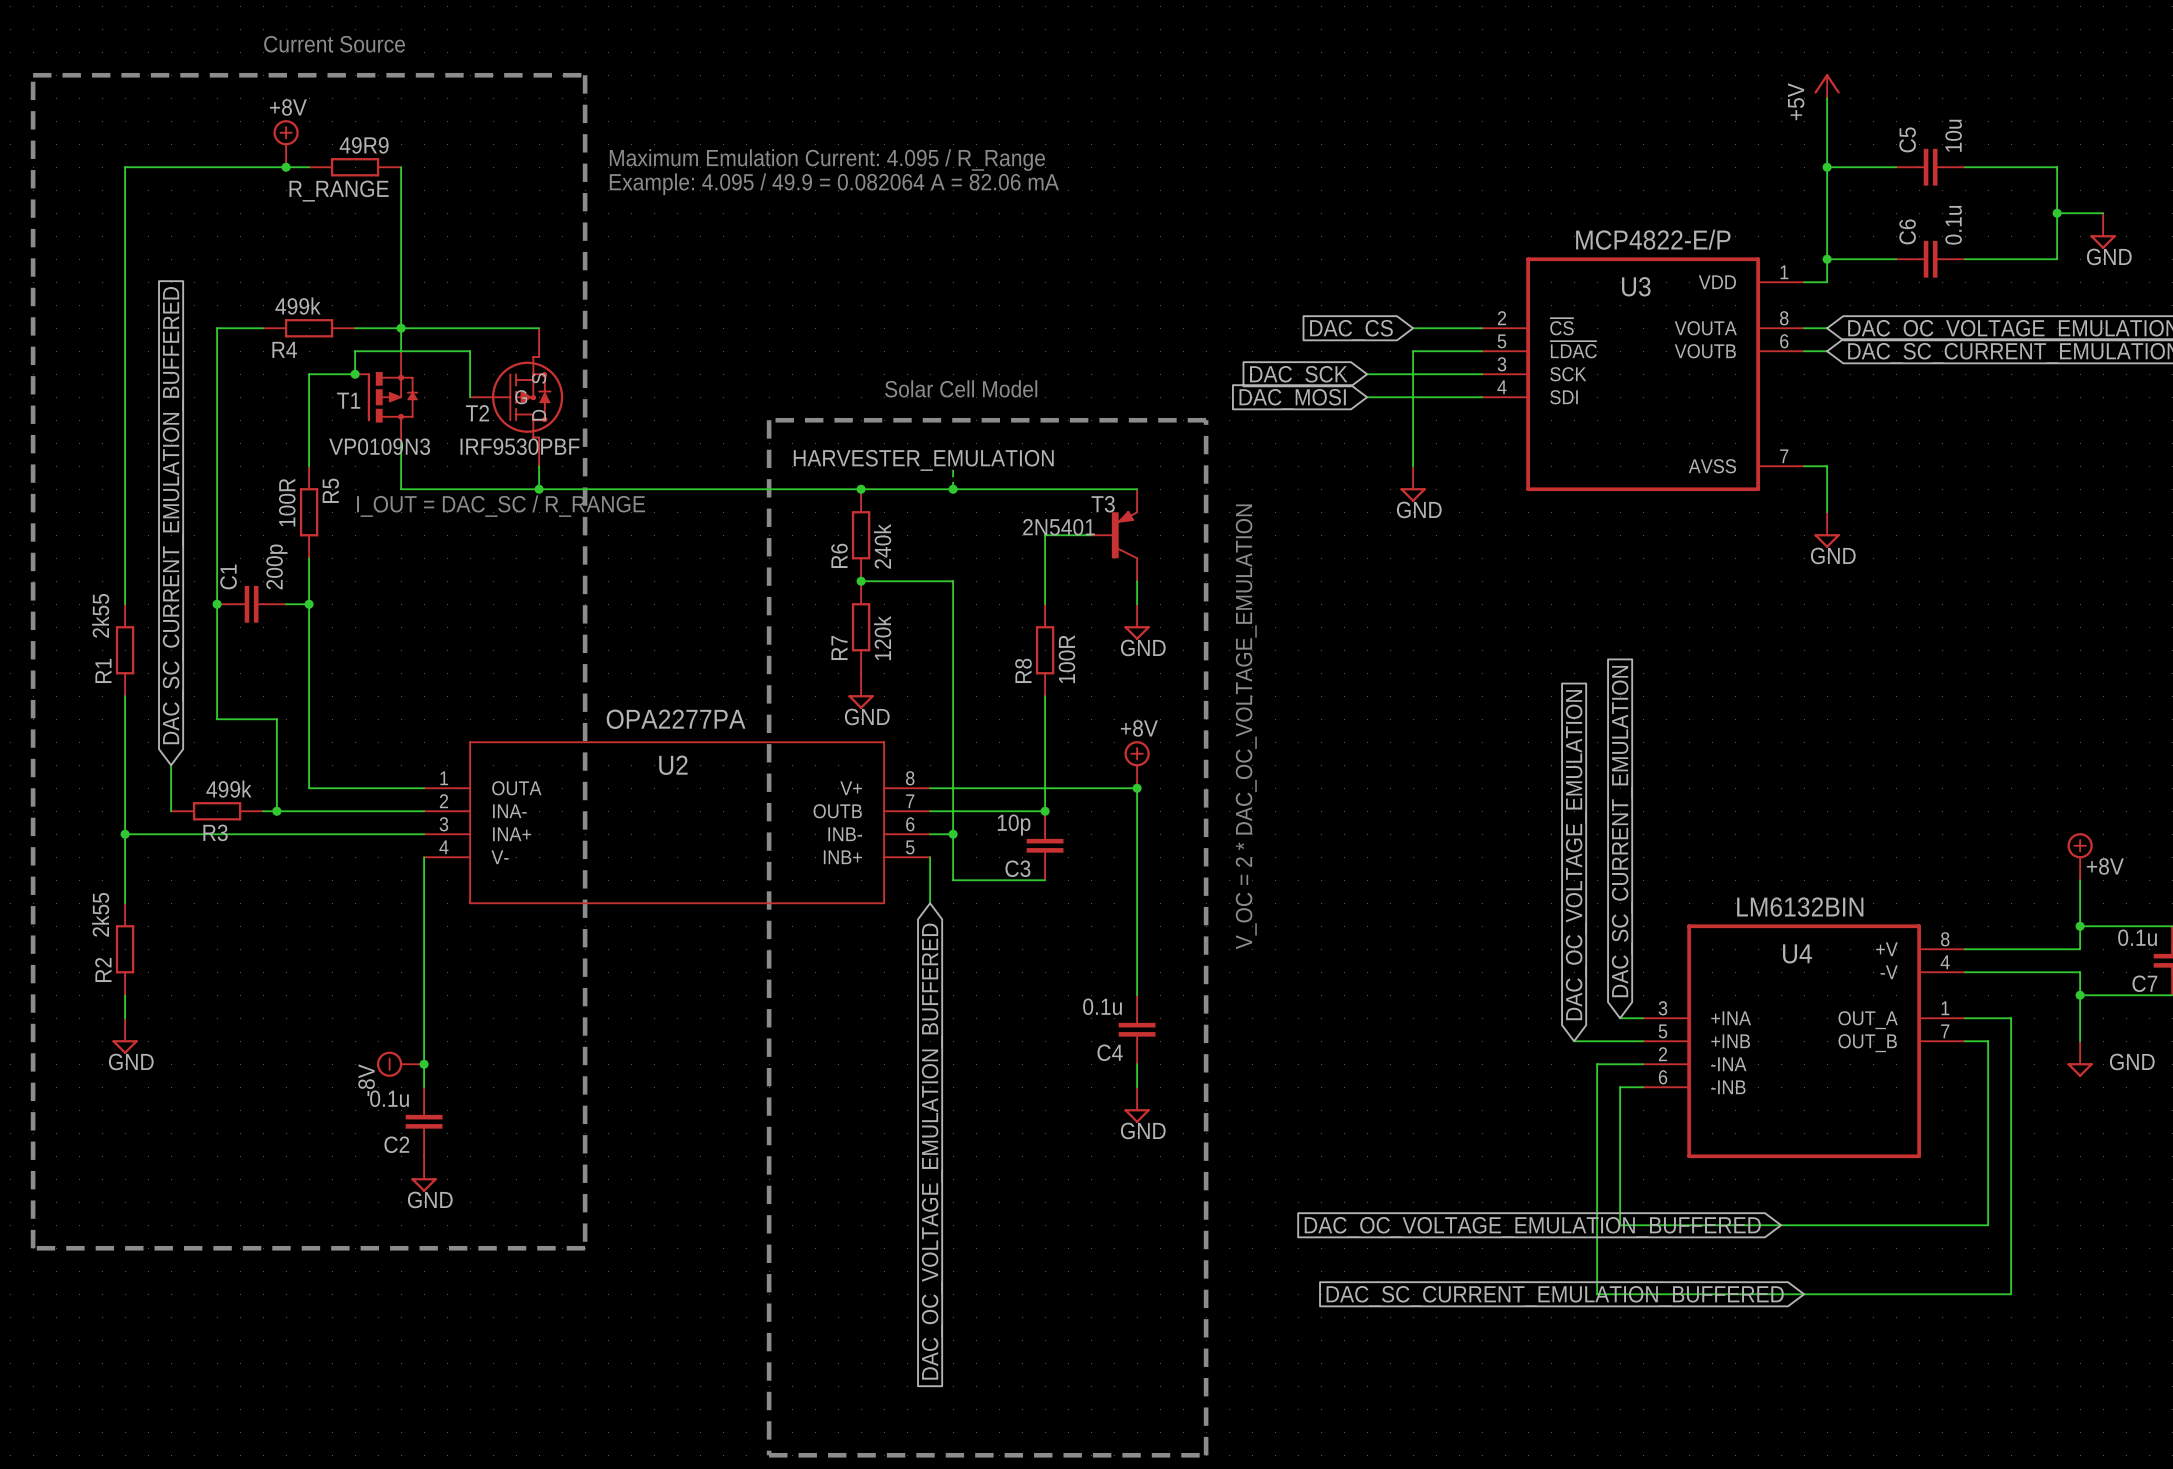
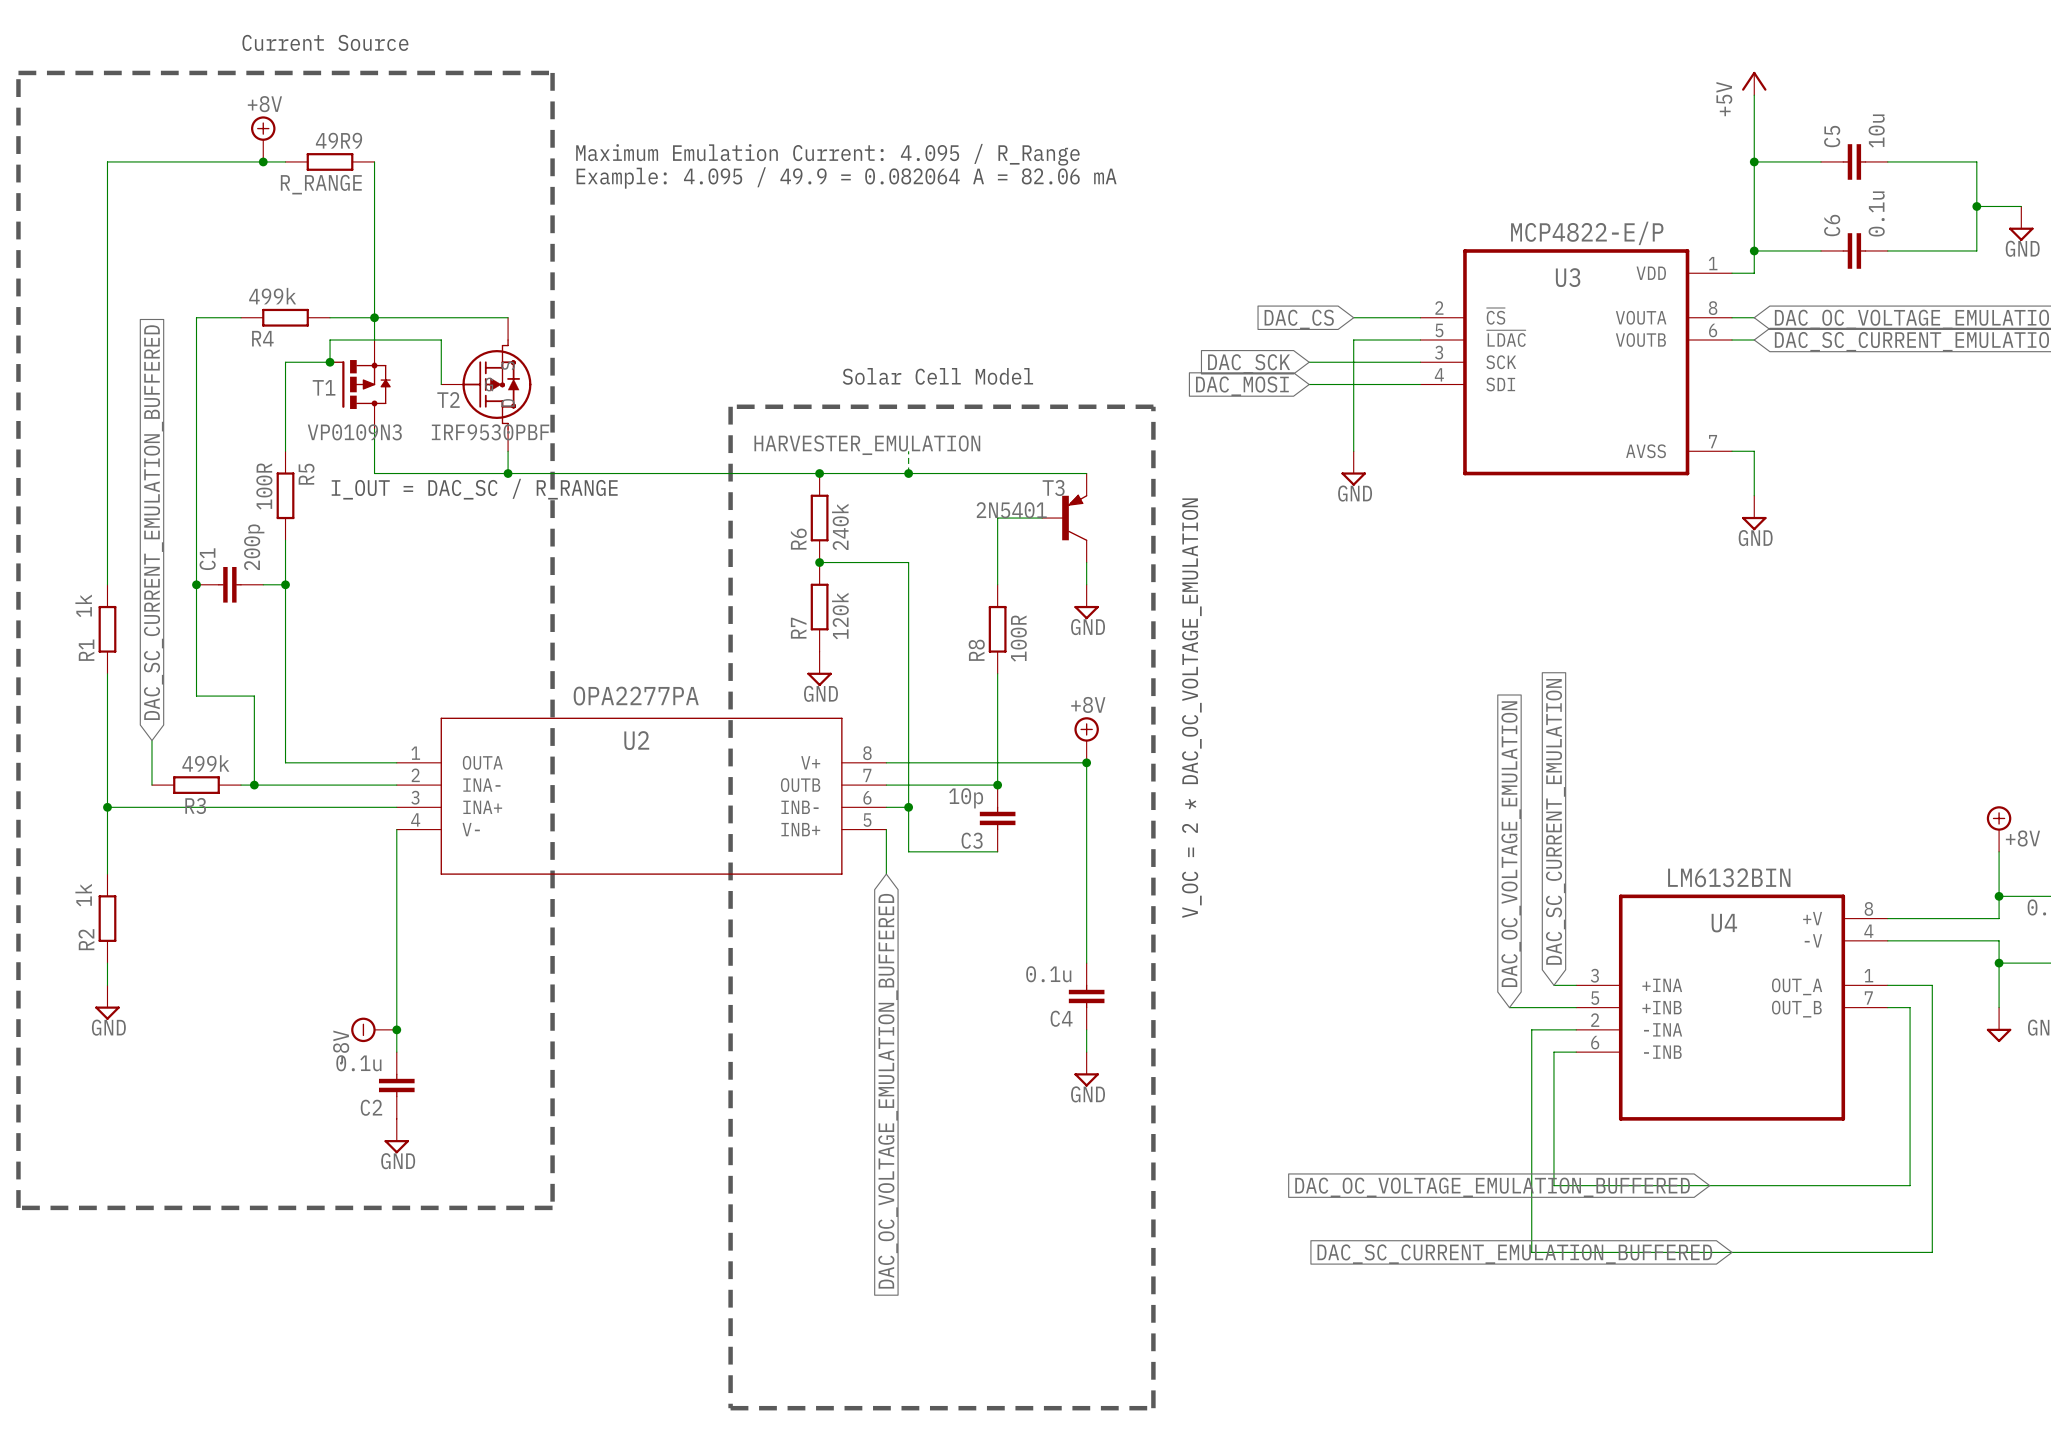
R1 value: 2k55 (100, 615) -> 1k (83, 605)
R2 value: 2k55 (100, 914) -> 1k (83, 895)

